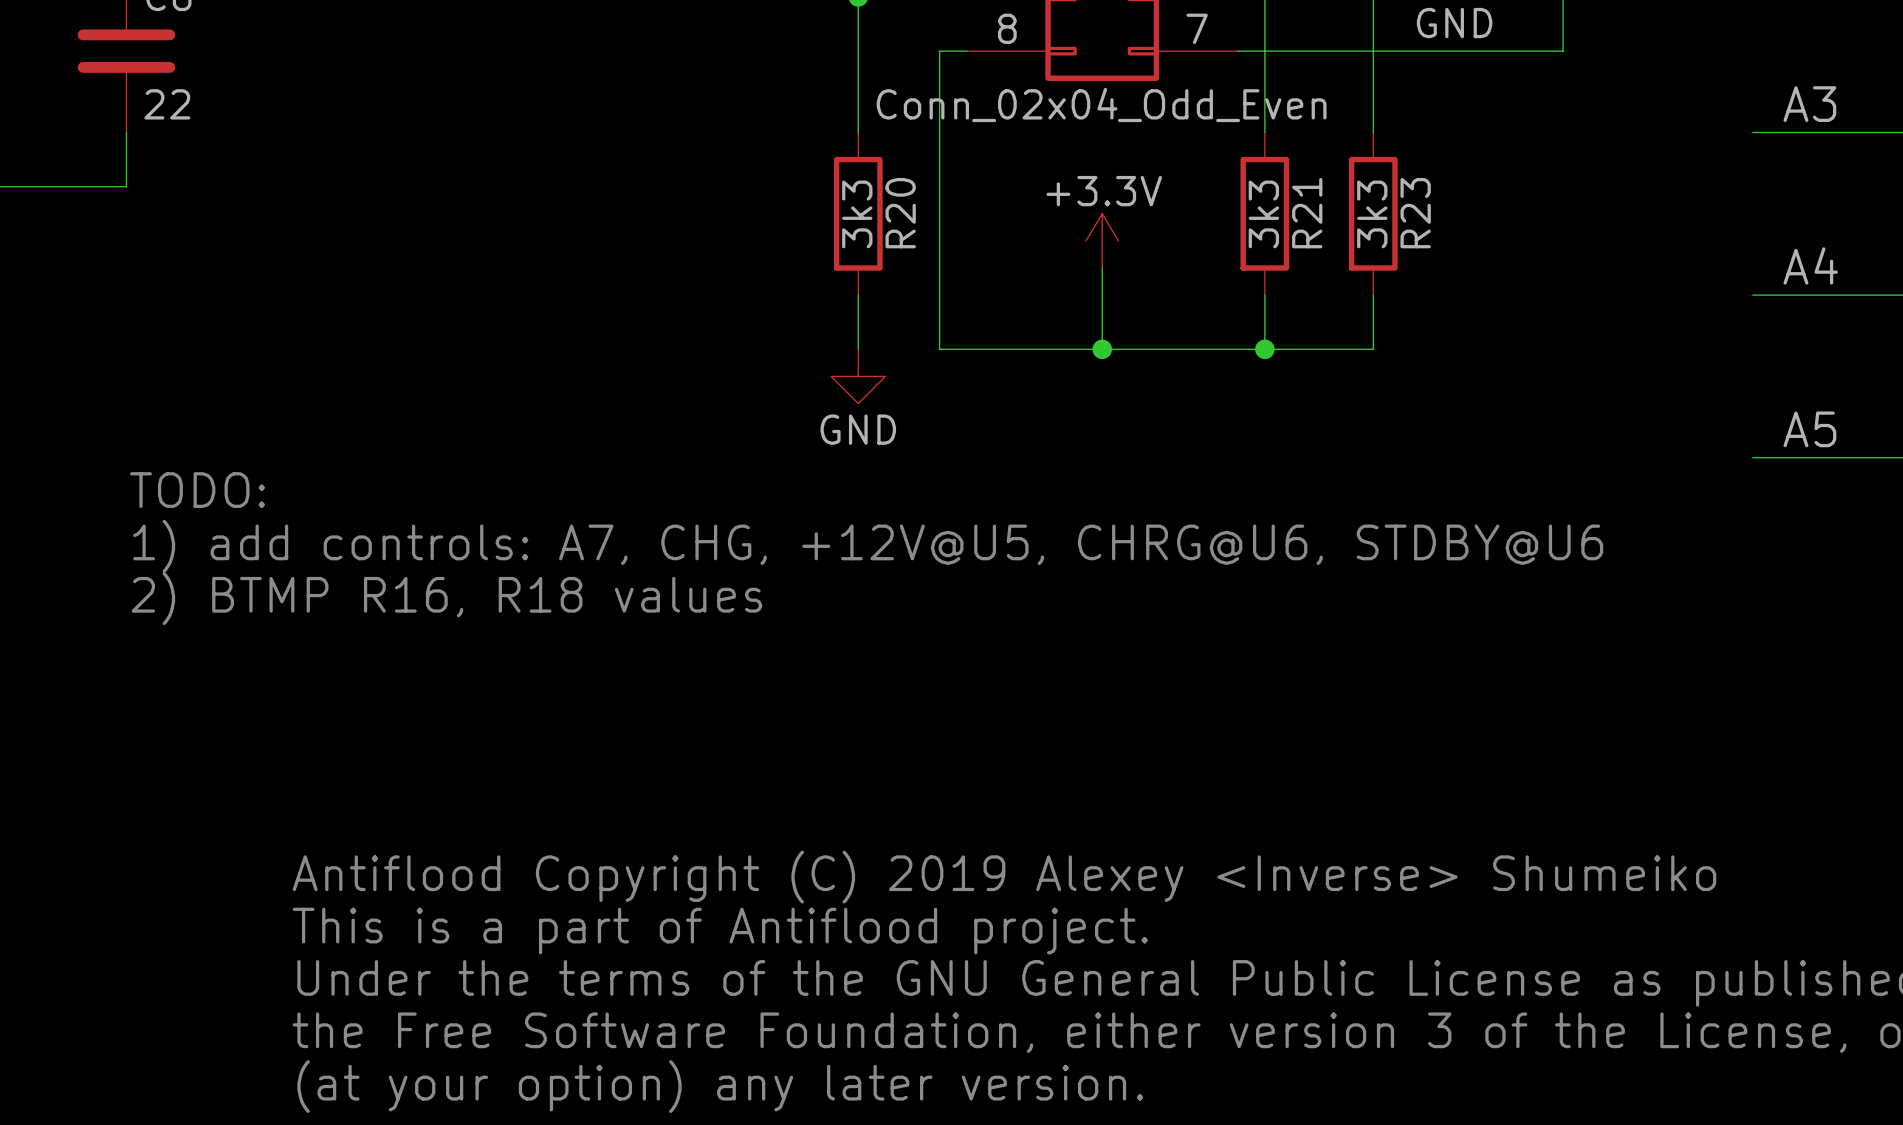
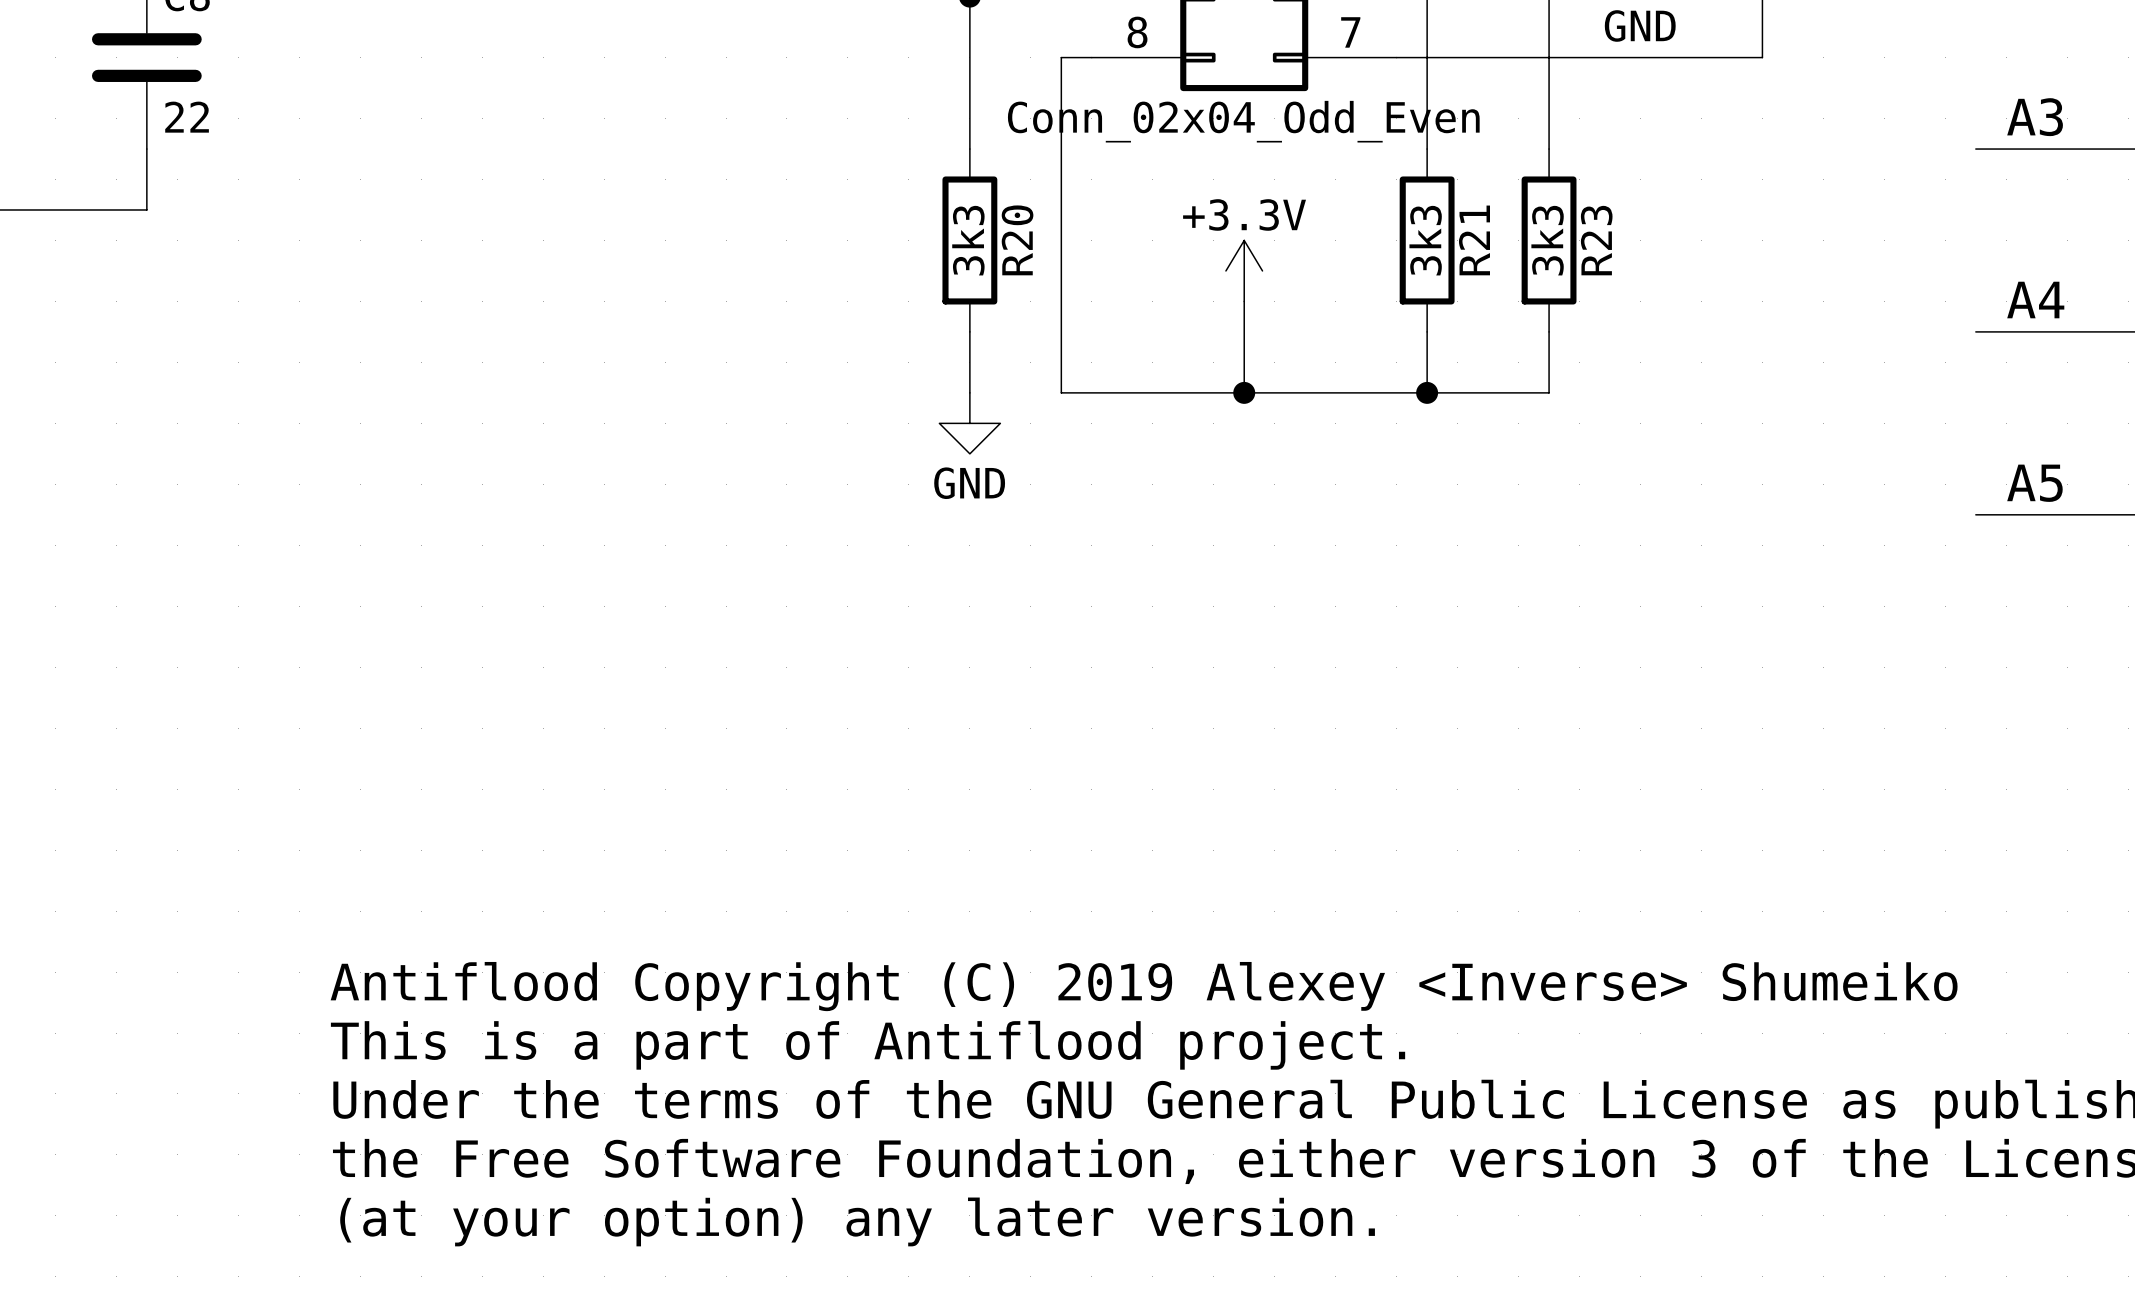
text: TODO: (197, 490) -> none
text: 1) add controls: A7, CHG, +12V@U5, CHRG@U6, STDBY@U6 (868, 546) -> none
text: 2) BTMP R16, R18 values (446, 598) -> none

